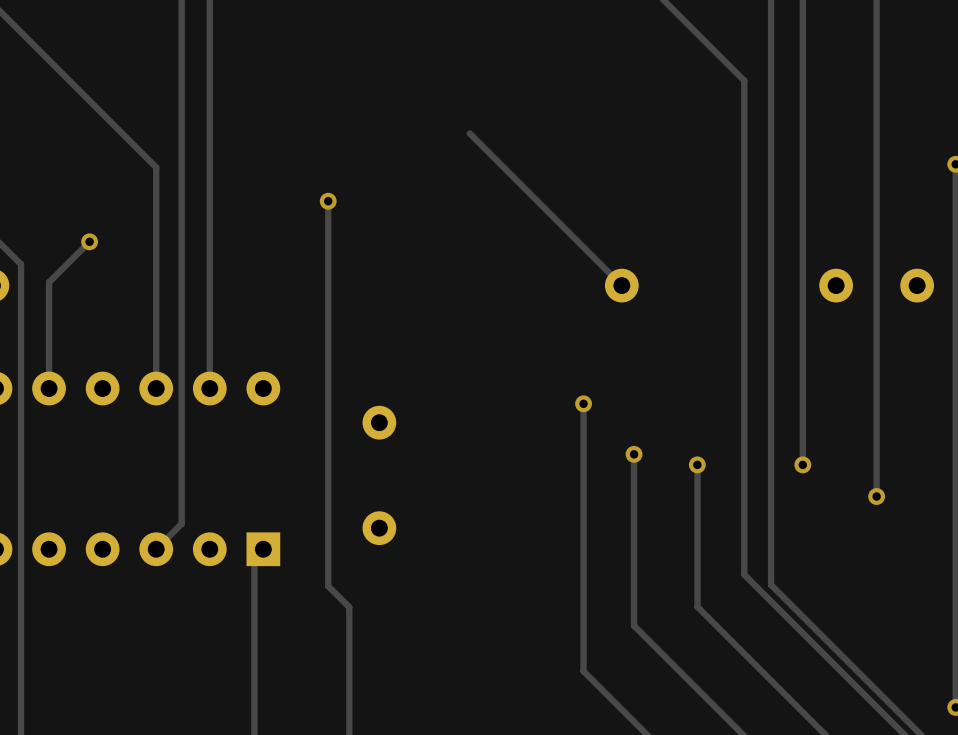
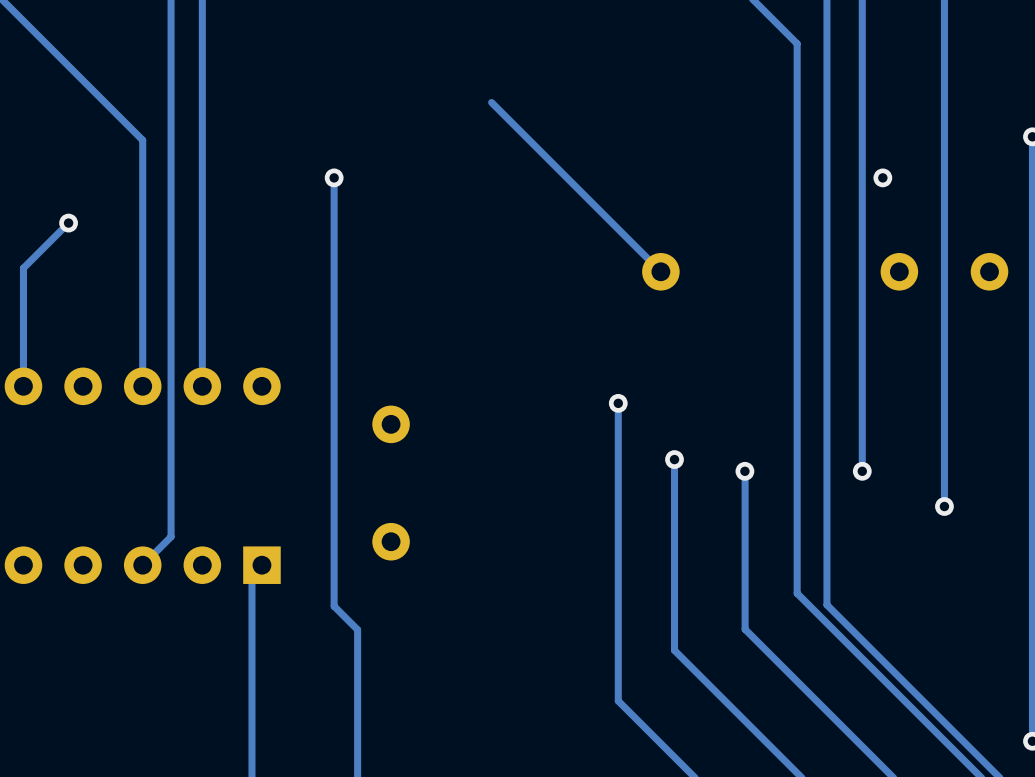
via: none -> (882, 177)

